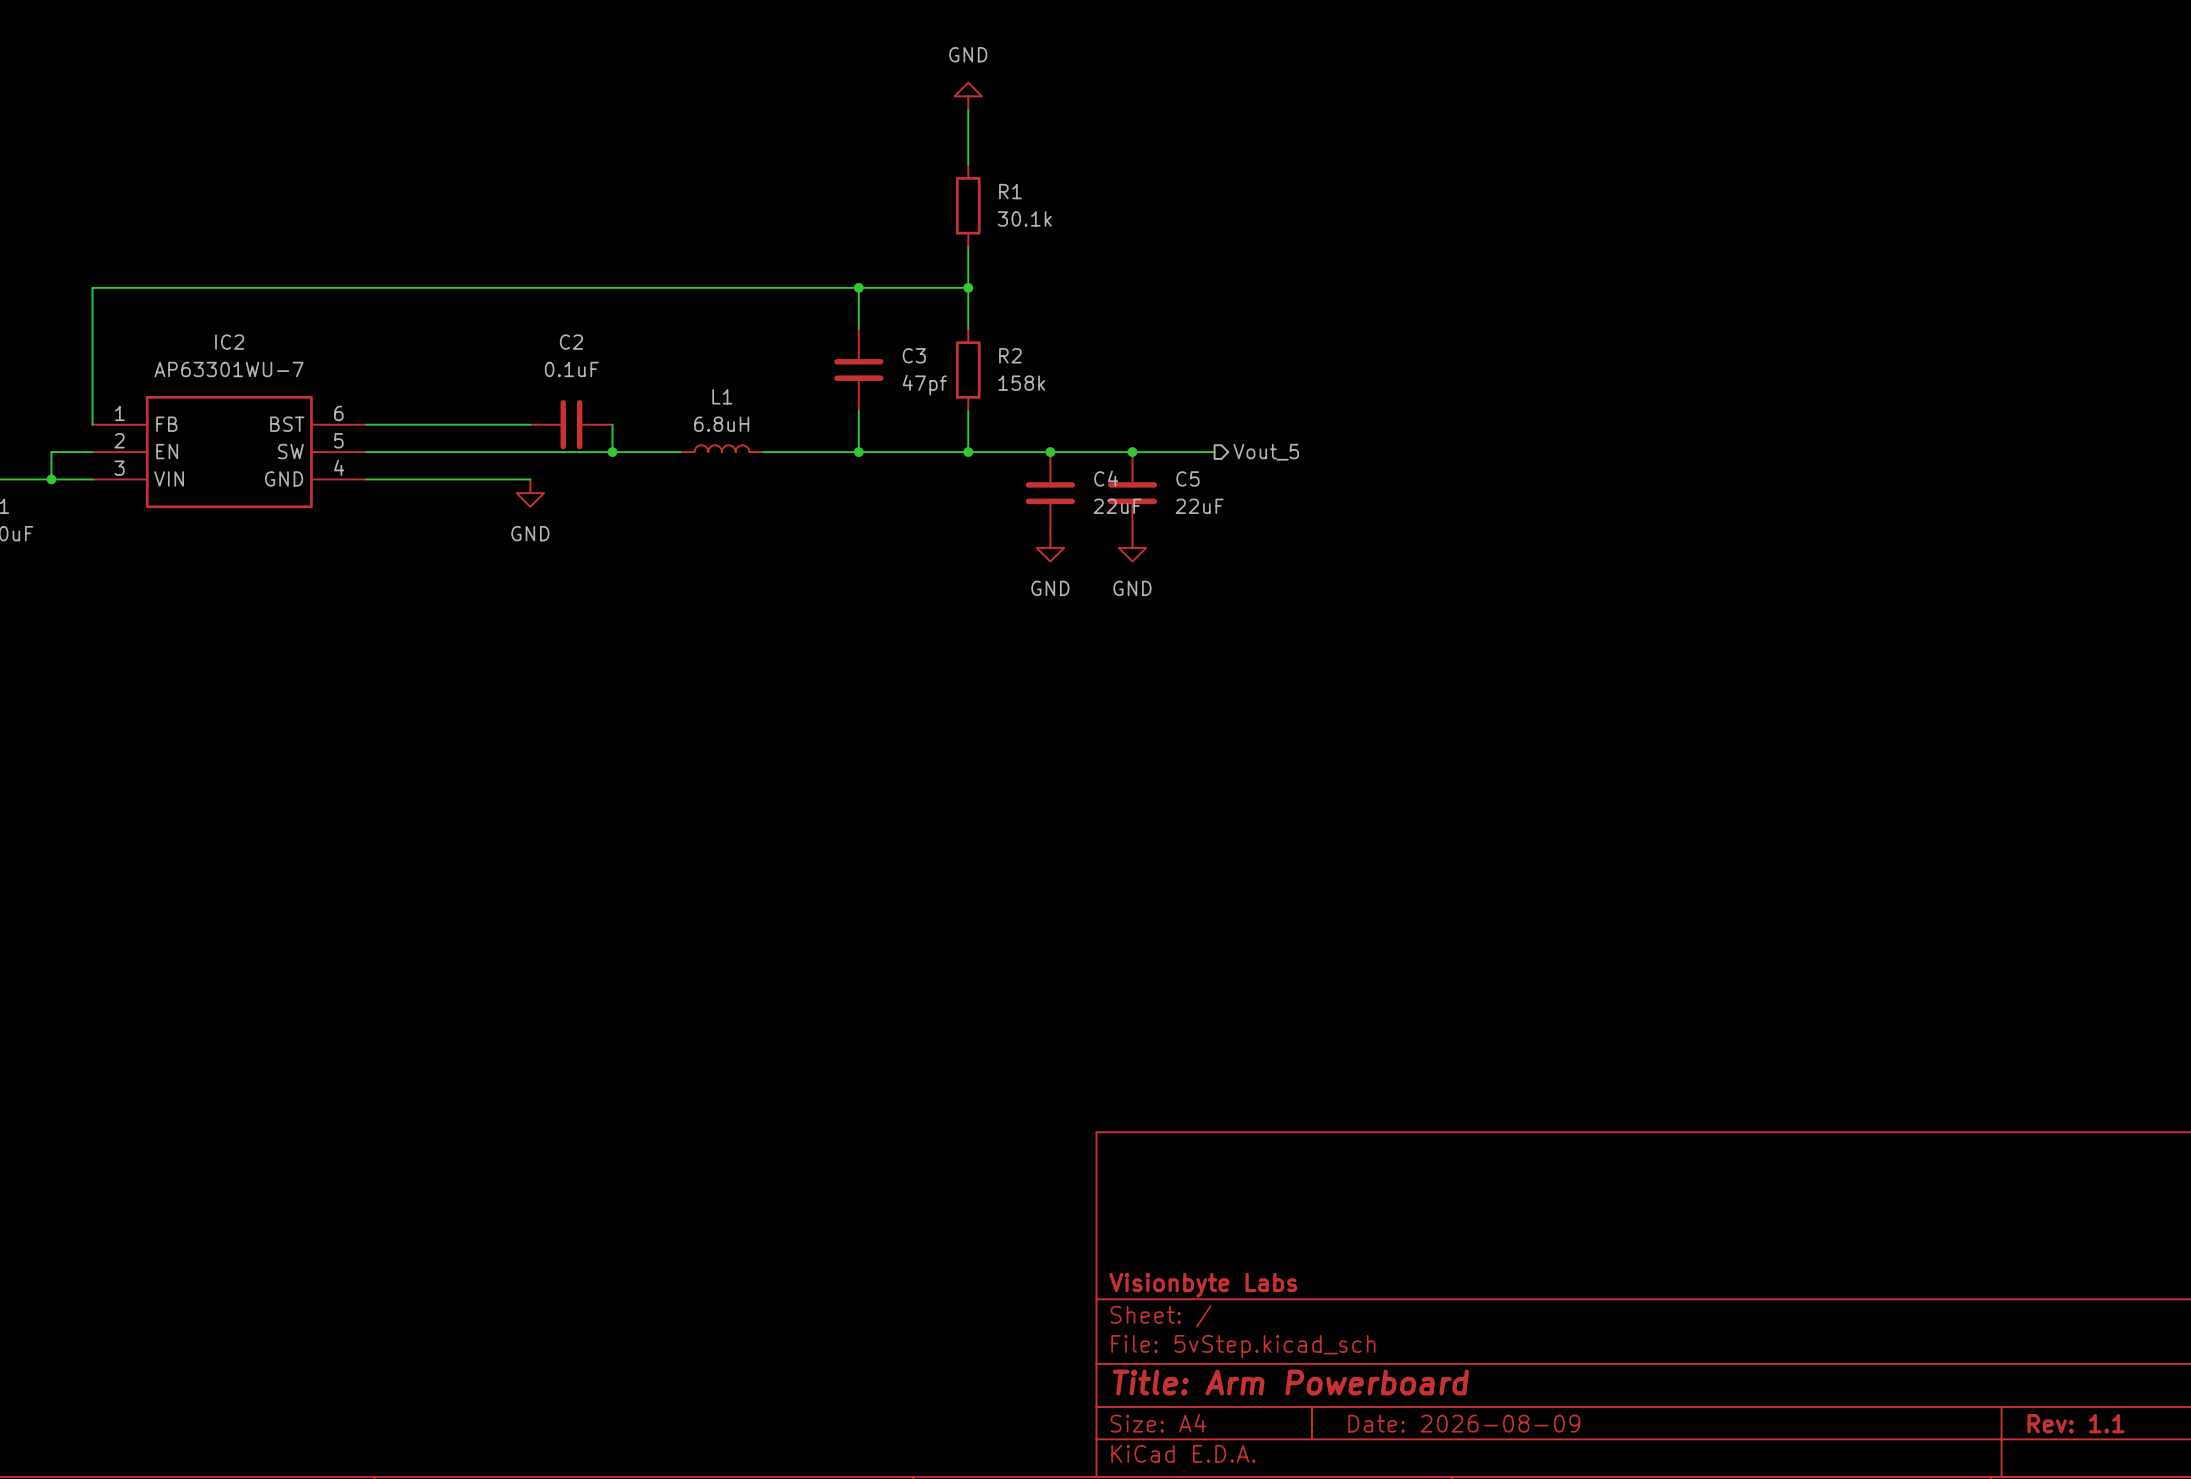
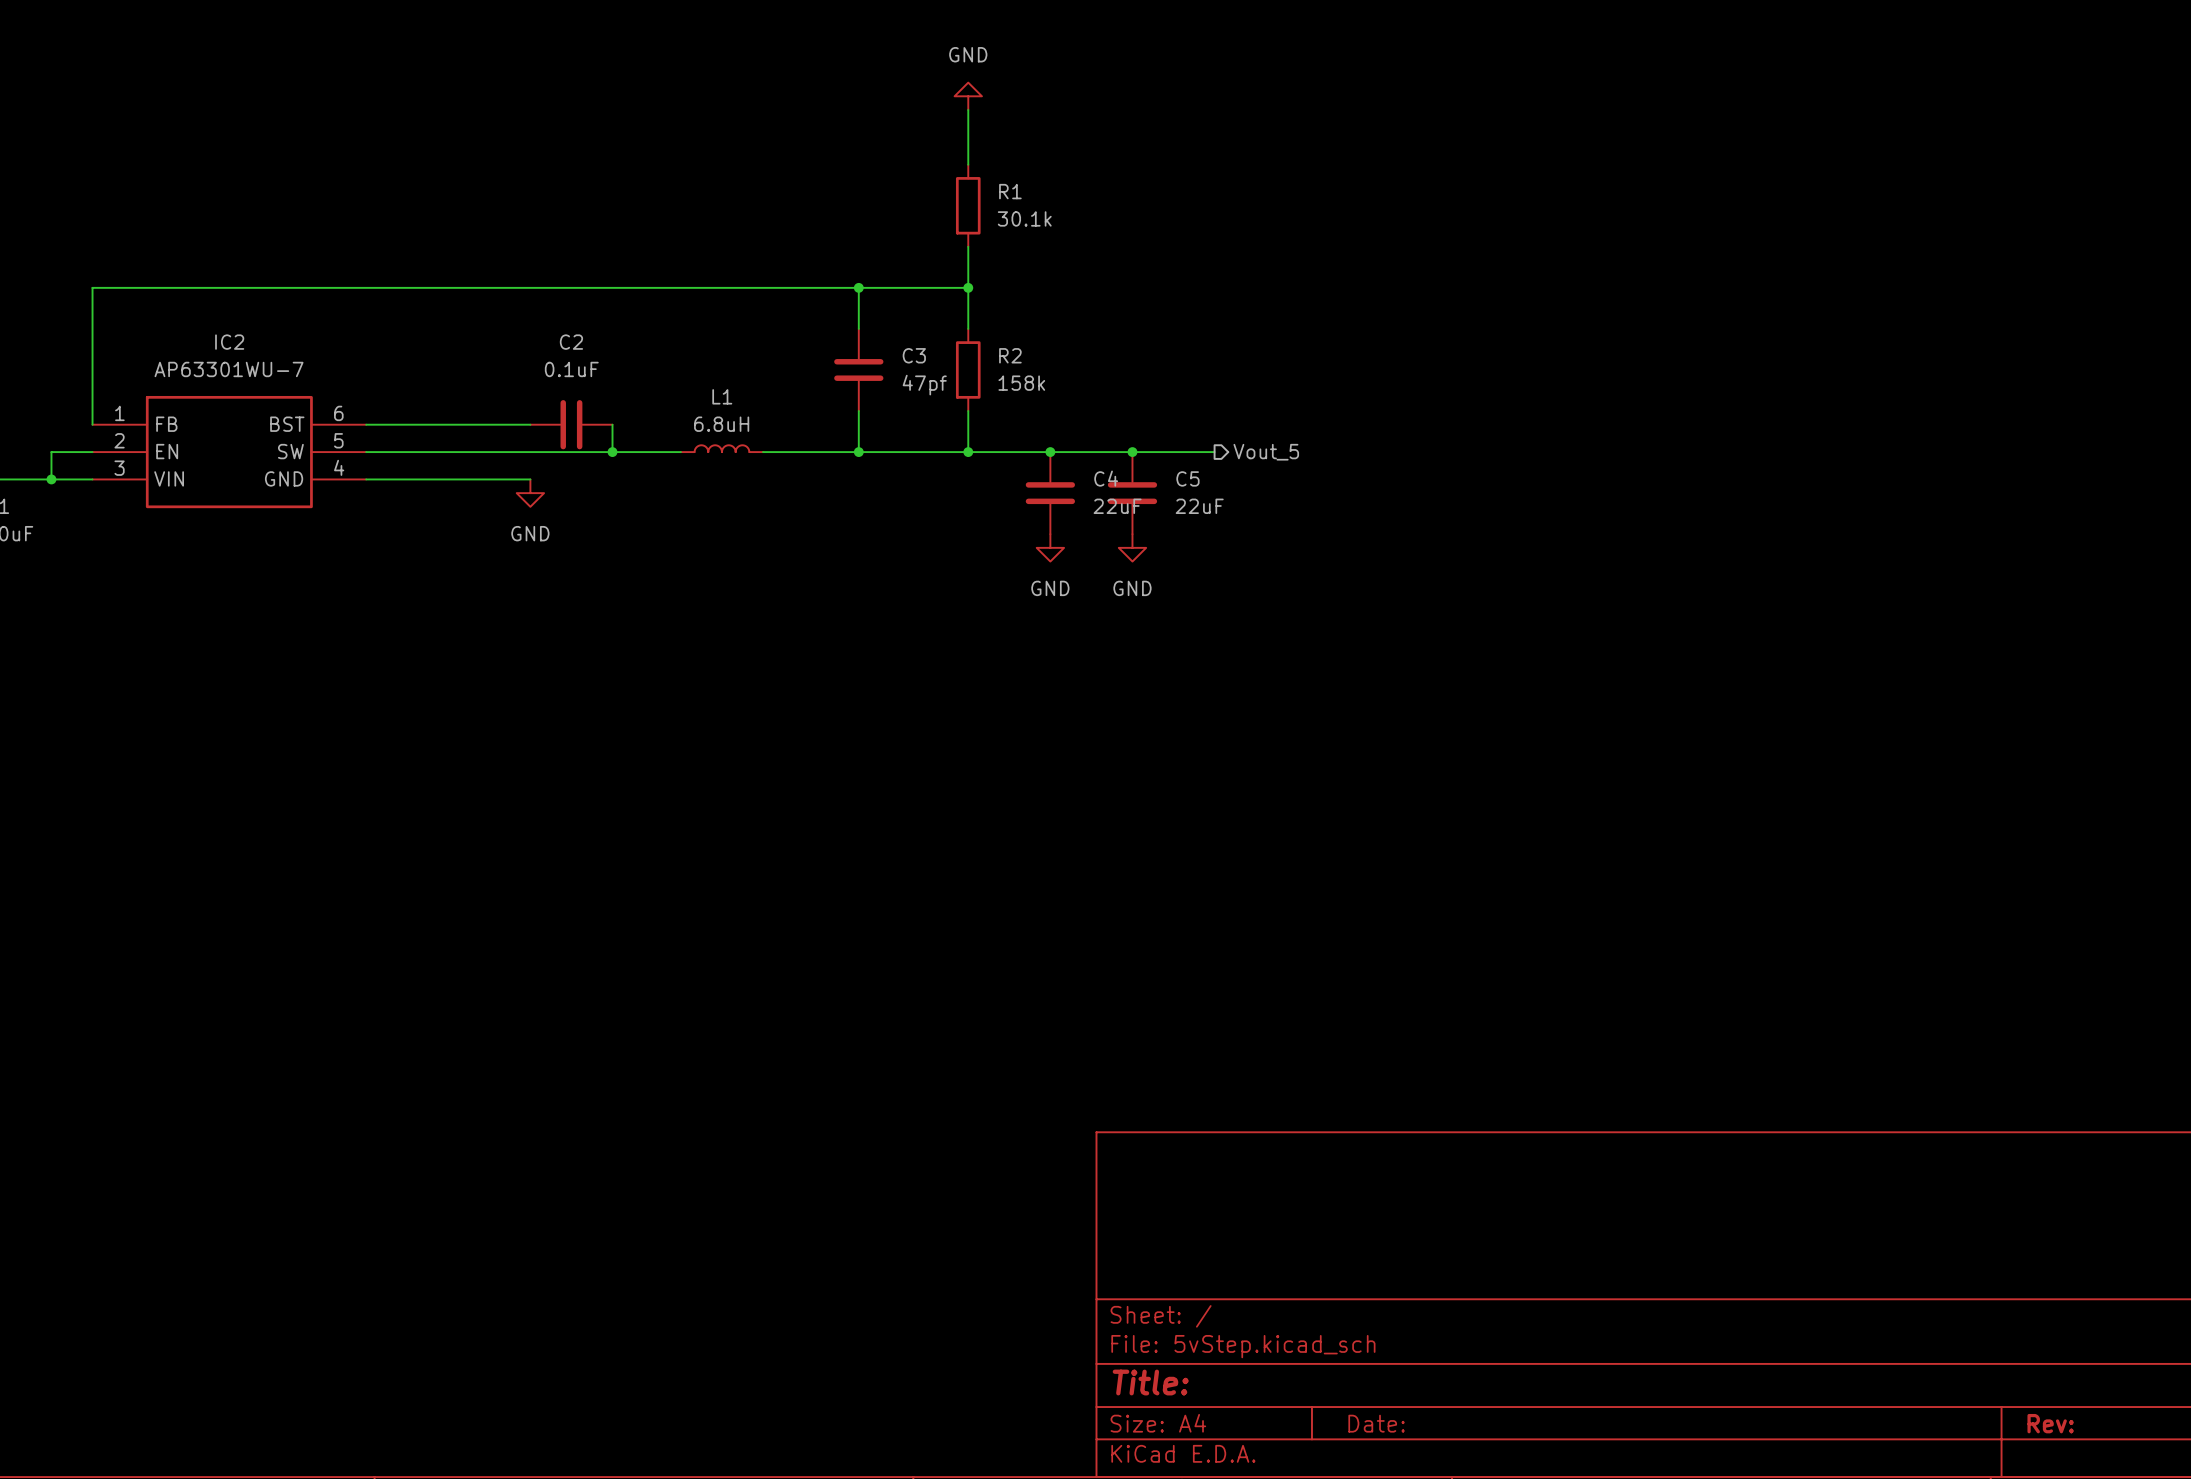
title block: Visionbyte Labs (1203, 1285) -> none
title block: Title: Arm Powerboard (1290, 1382) -> Title: (1150, 1382)
title block: Date: 2026-08-09 (1464, 1423) -> Date: (1376, 1423)
title block: Rev: 1.1 (2076, 1423) -> Rev: (2050, 1423)

